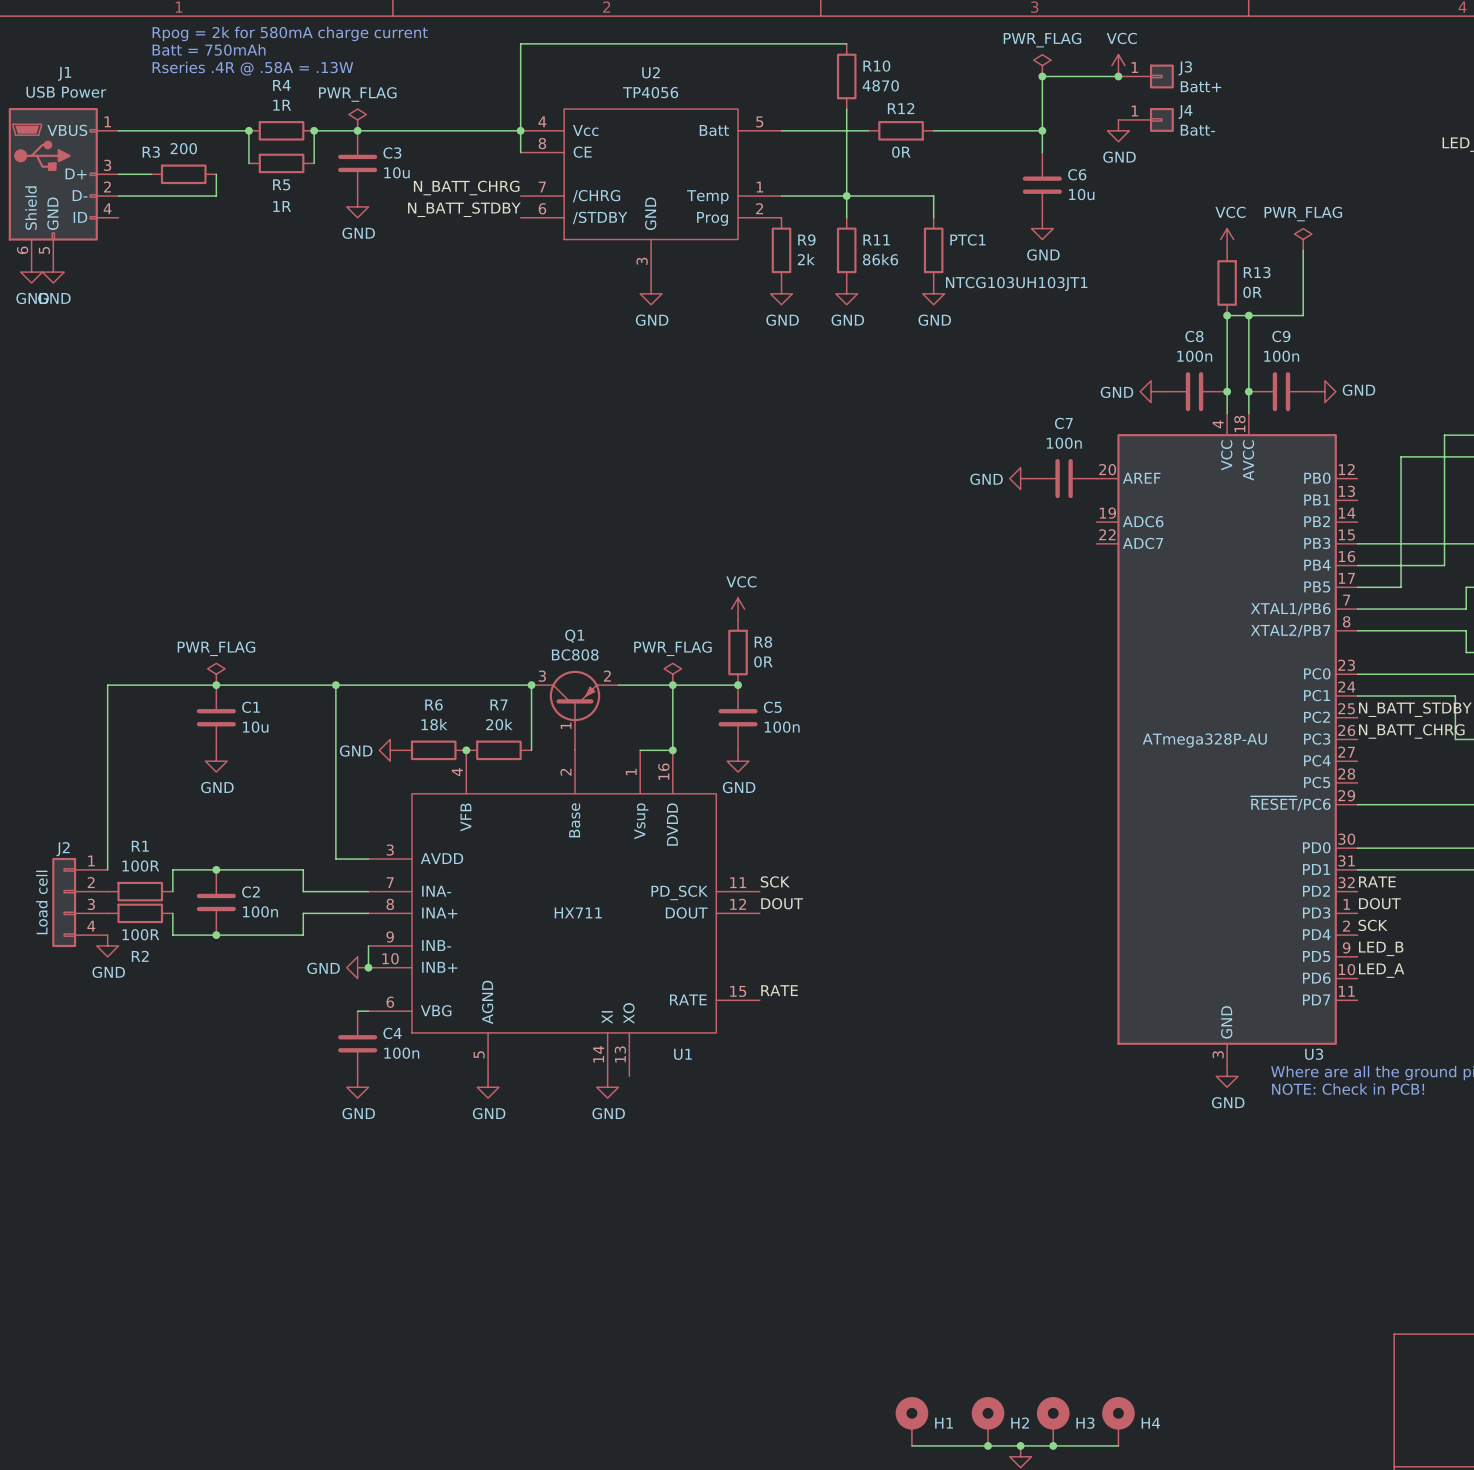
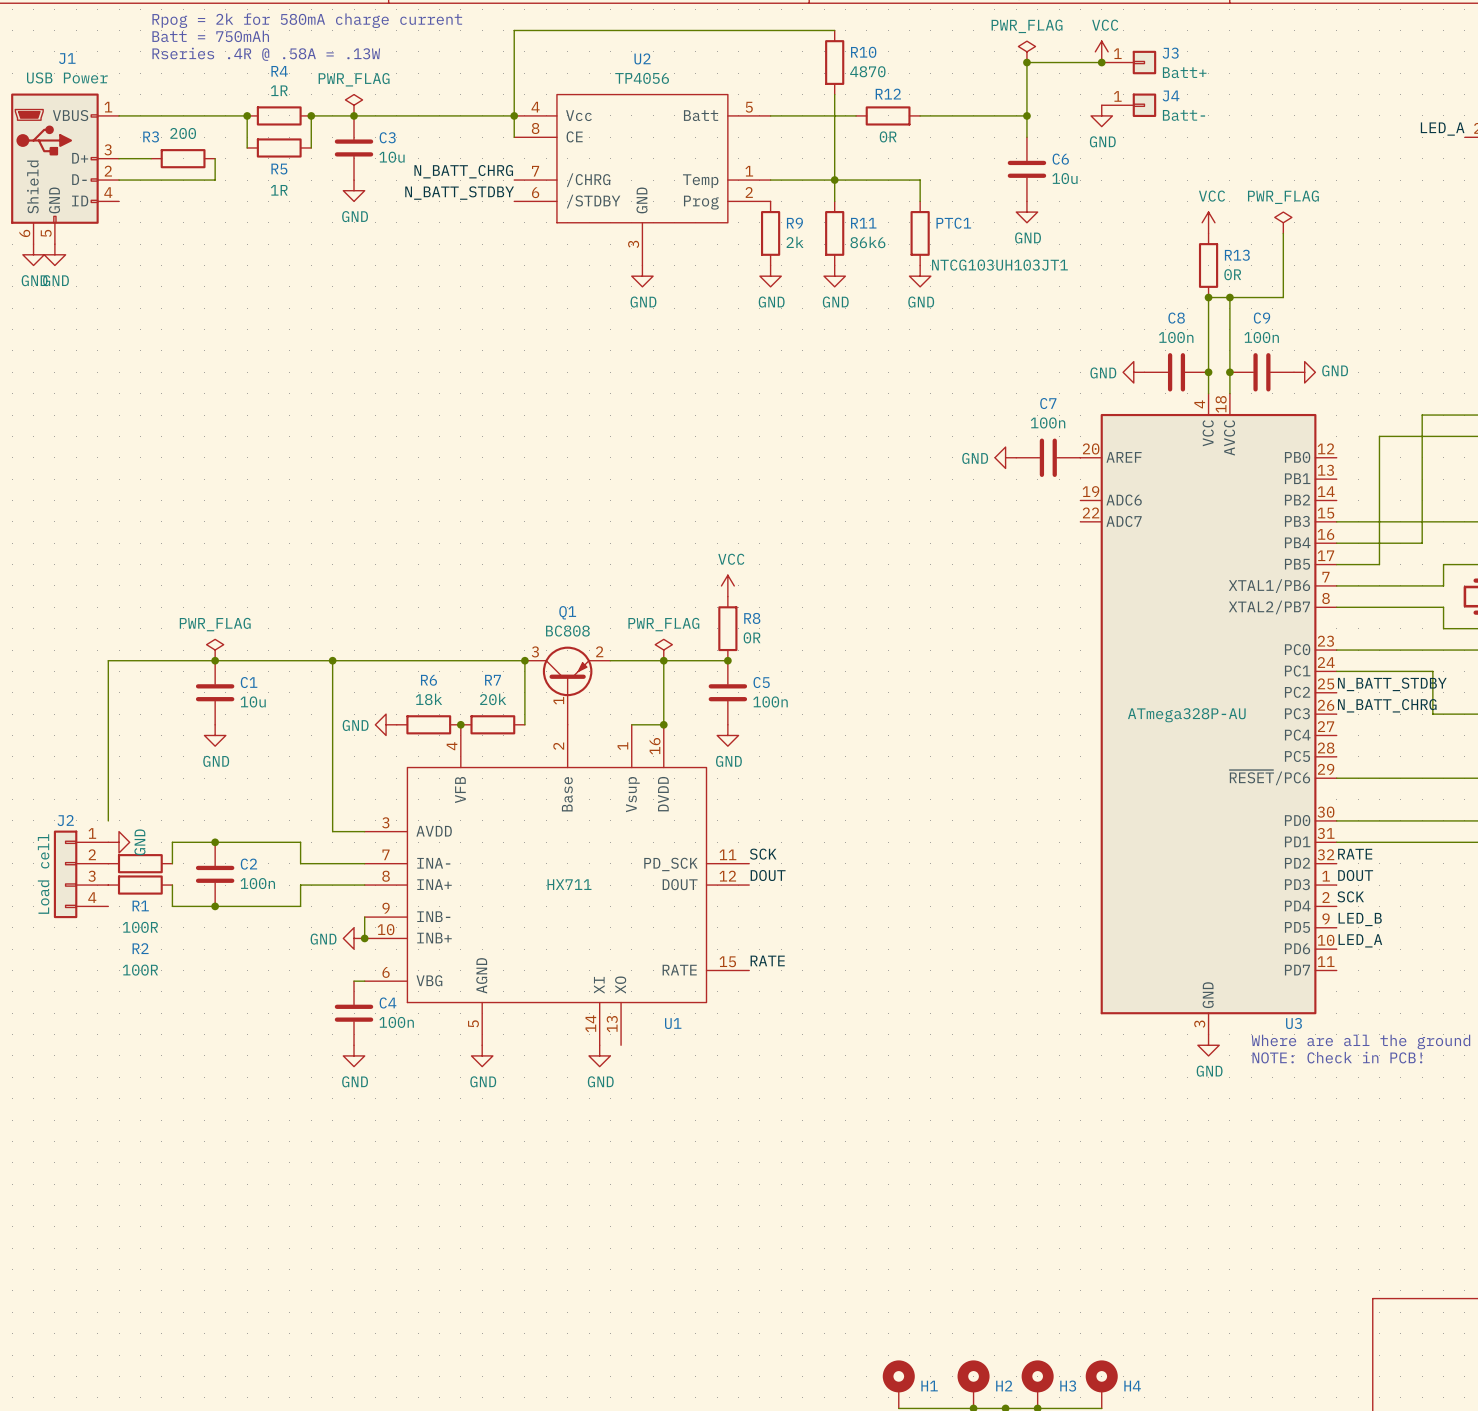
R1 name position: R1 (140, 846) -> R1 (140, 906)
wire: (107, 848) (107, 869) -> none
R1 value position: 100R (140, 866) -> 100R (140, 927)
R2 value position: 100R (140, 934) -> 100R (140, 970)
power symbol rotation: 0° (107, 945) -> 90° counterclockwise (119, 842)
power symbol position: GND (107, 945) -> GND (119, 842)
R2 name position: R2 (140, 956) -> R2 (140, 948)

